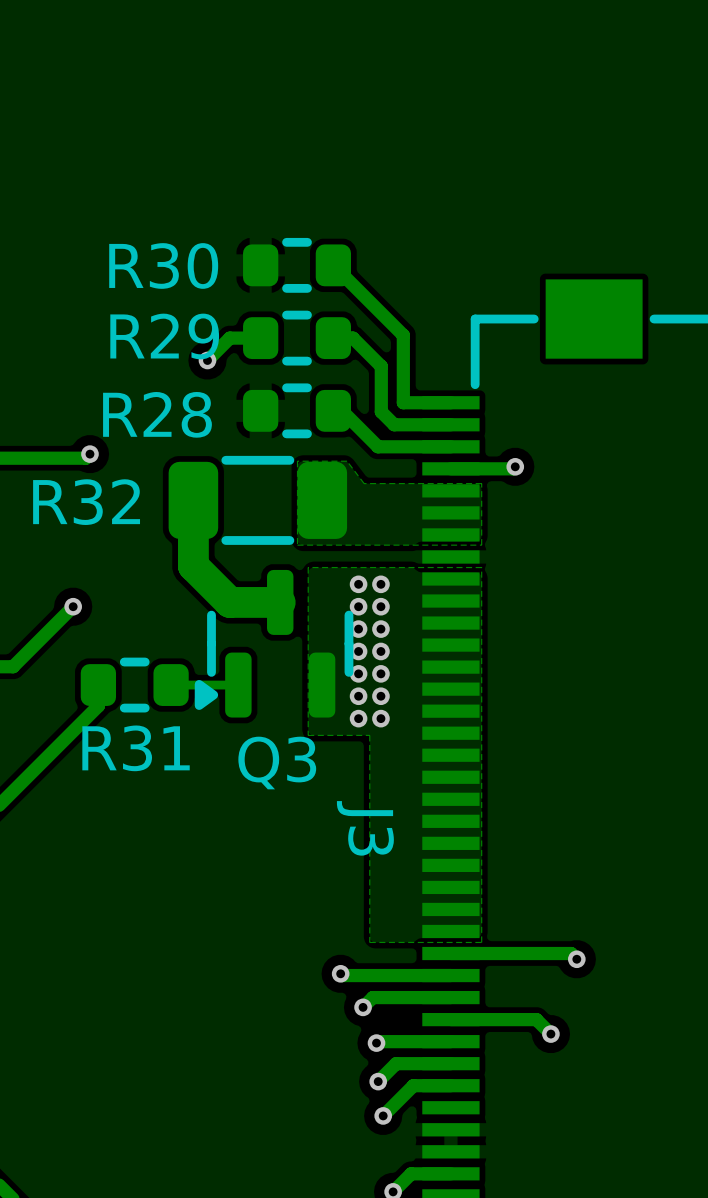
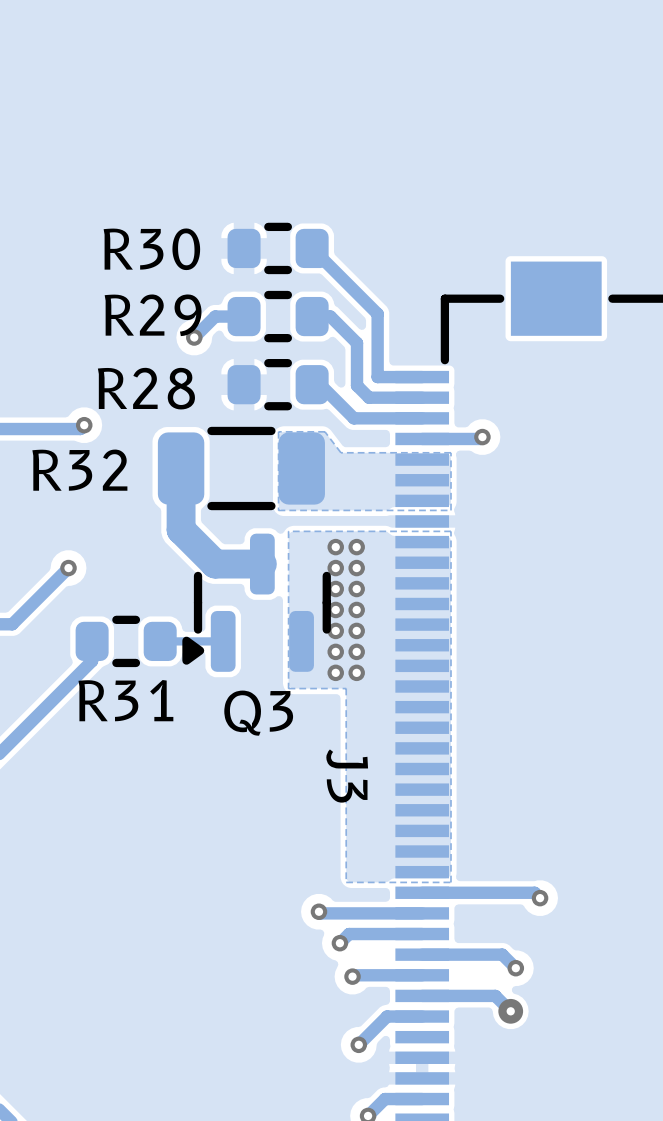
track: (450, 1063) (396, 1063) (378, 1081) -> (422, 995) (495, 995) (510, 1011)
via: none -> (510, 1011)
via: (378, 1081) -> none

